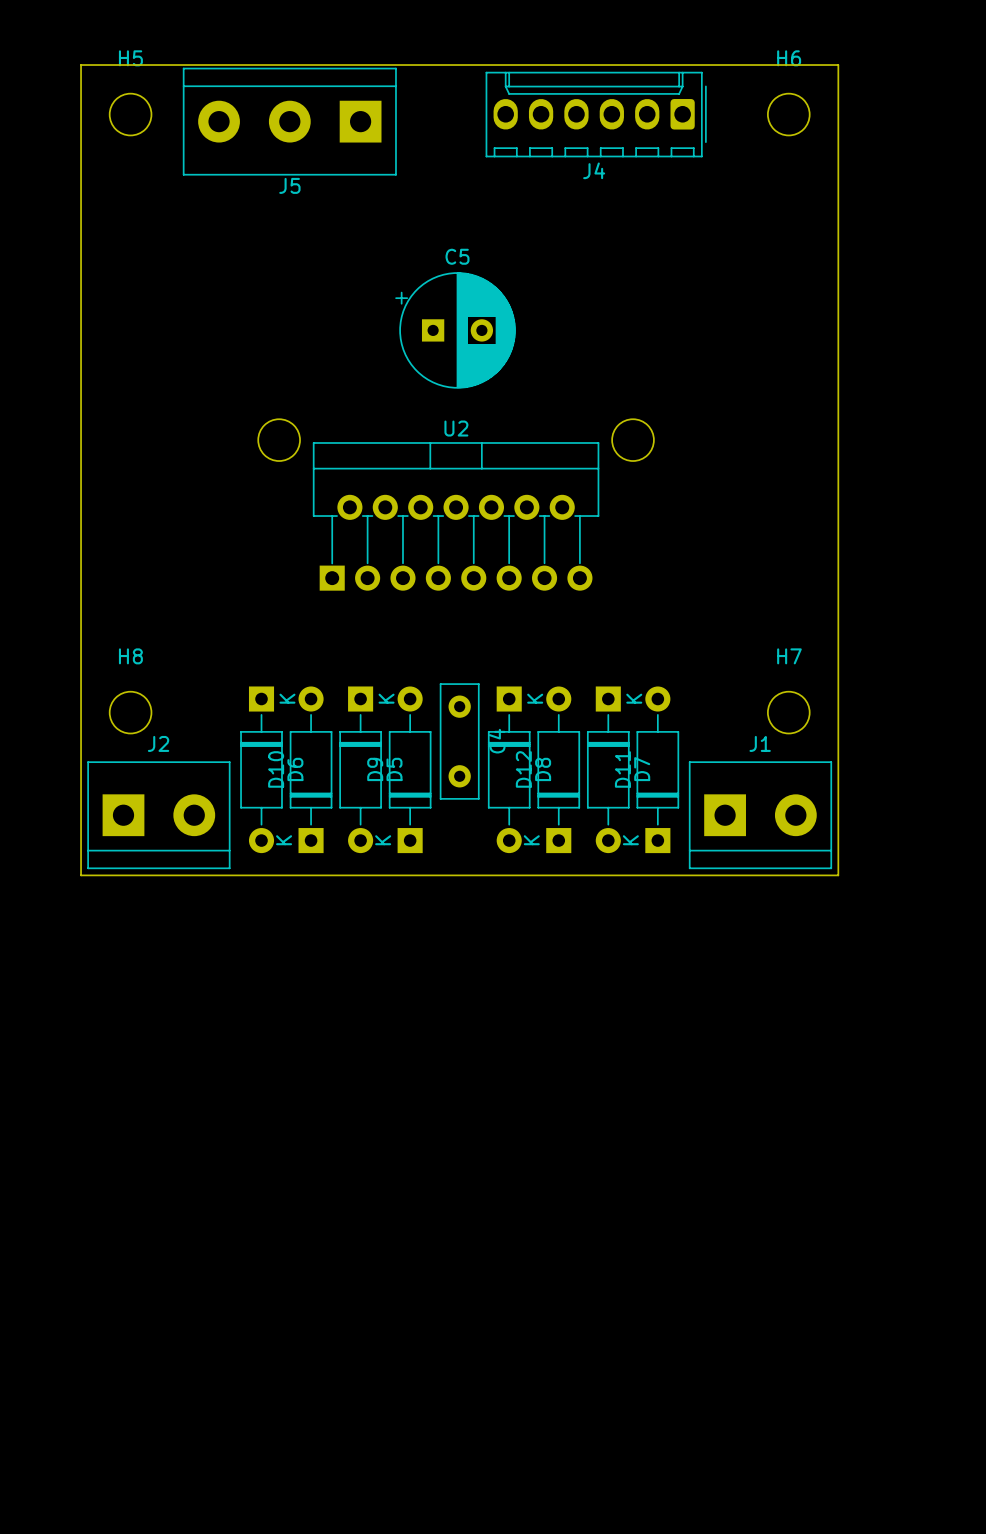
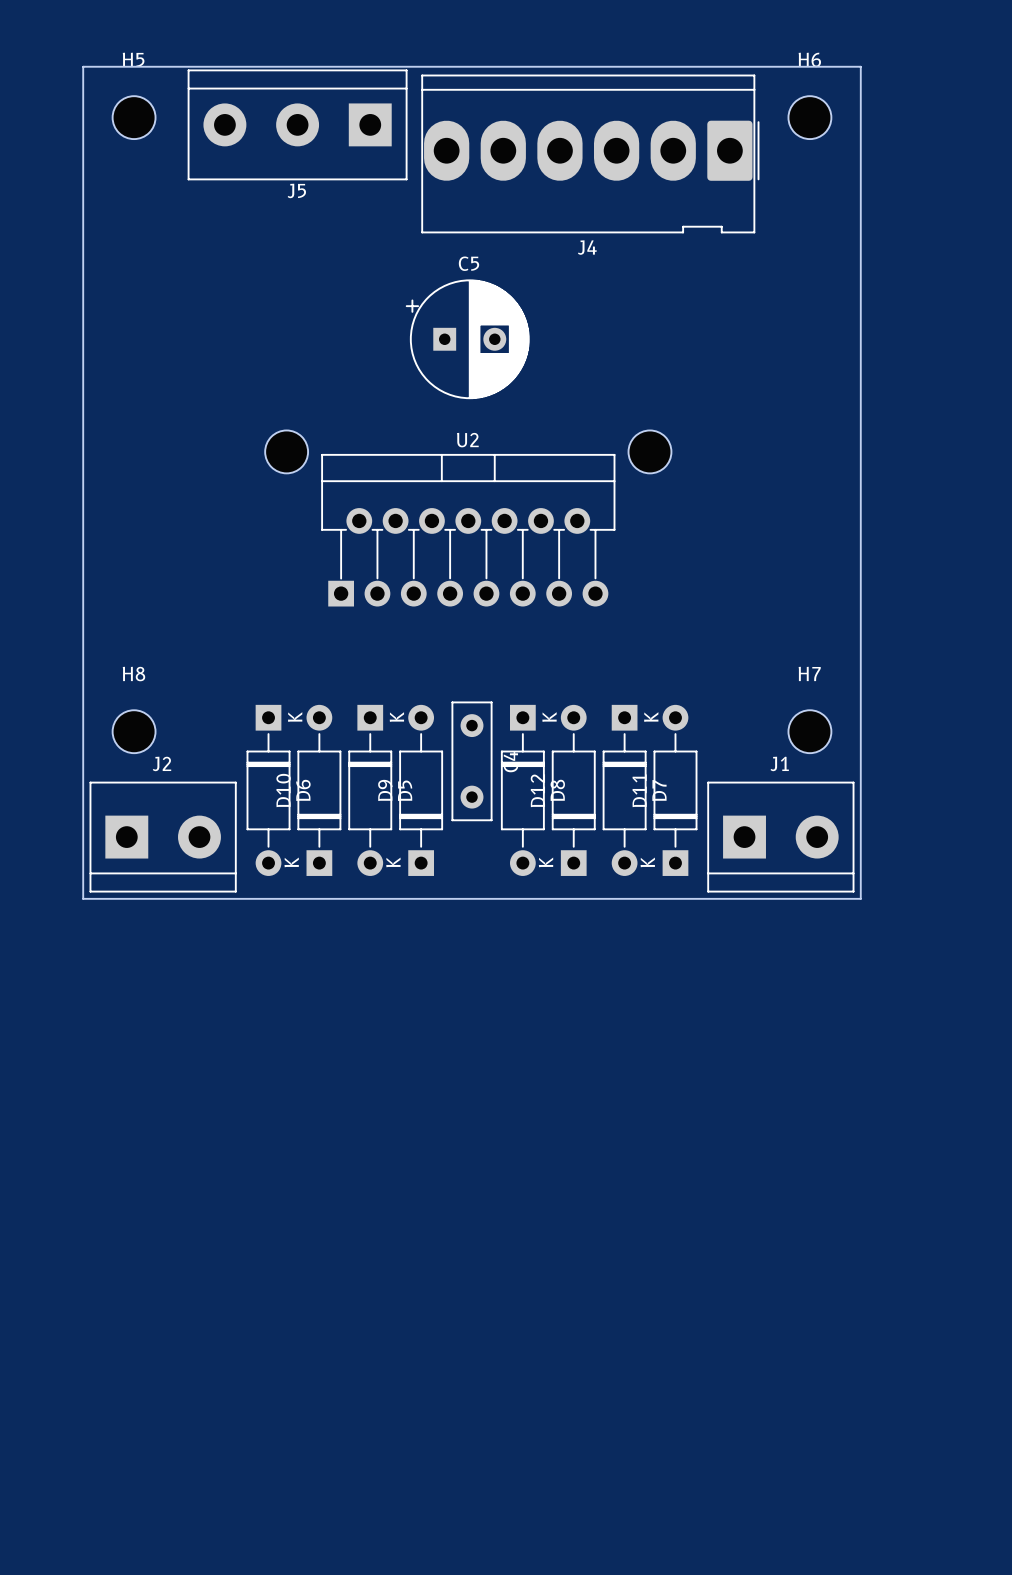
J4 footprint: [485, 71, 707, 158] -> [421, 74, 760, 234]
J4 name position: J4 (594, 170) -> J4 (587, 247)

